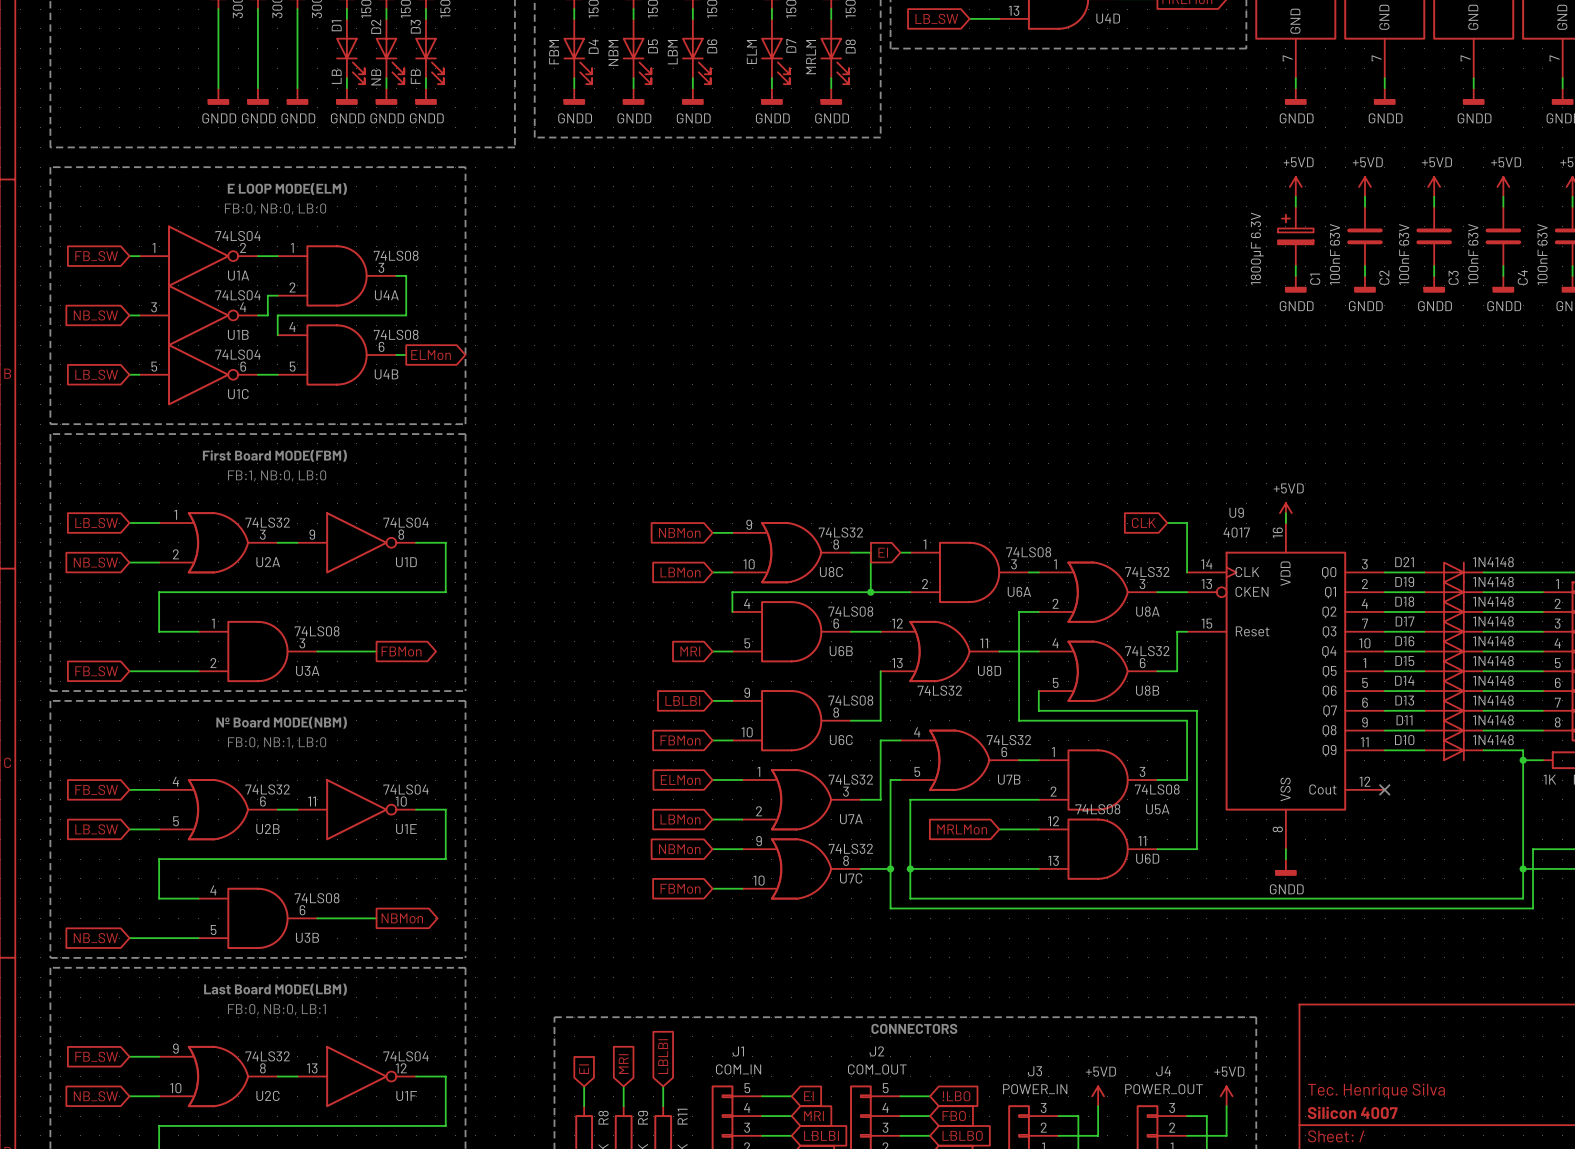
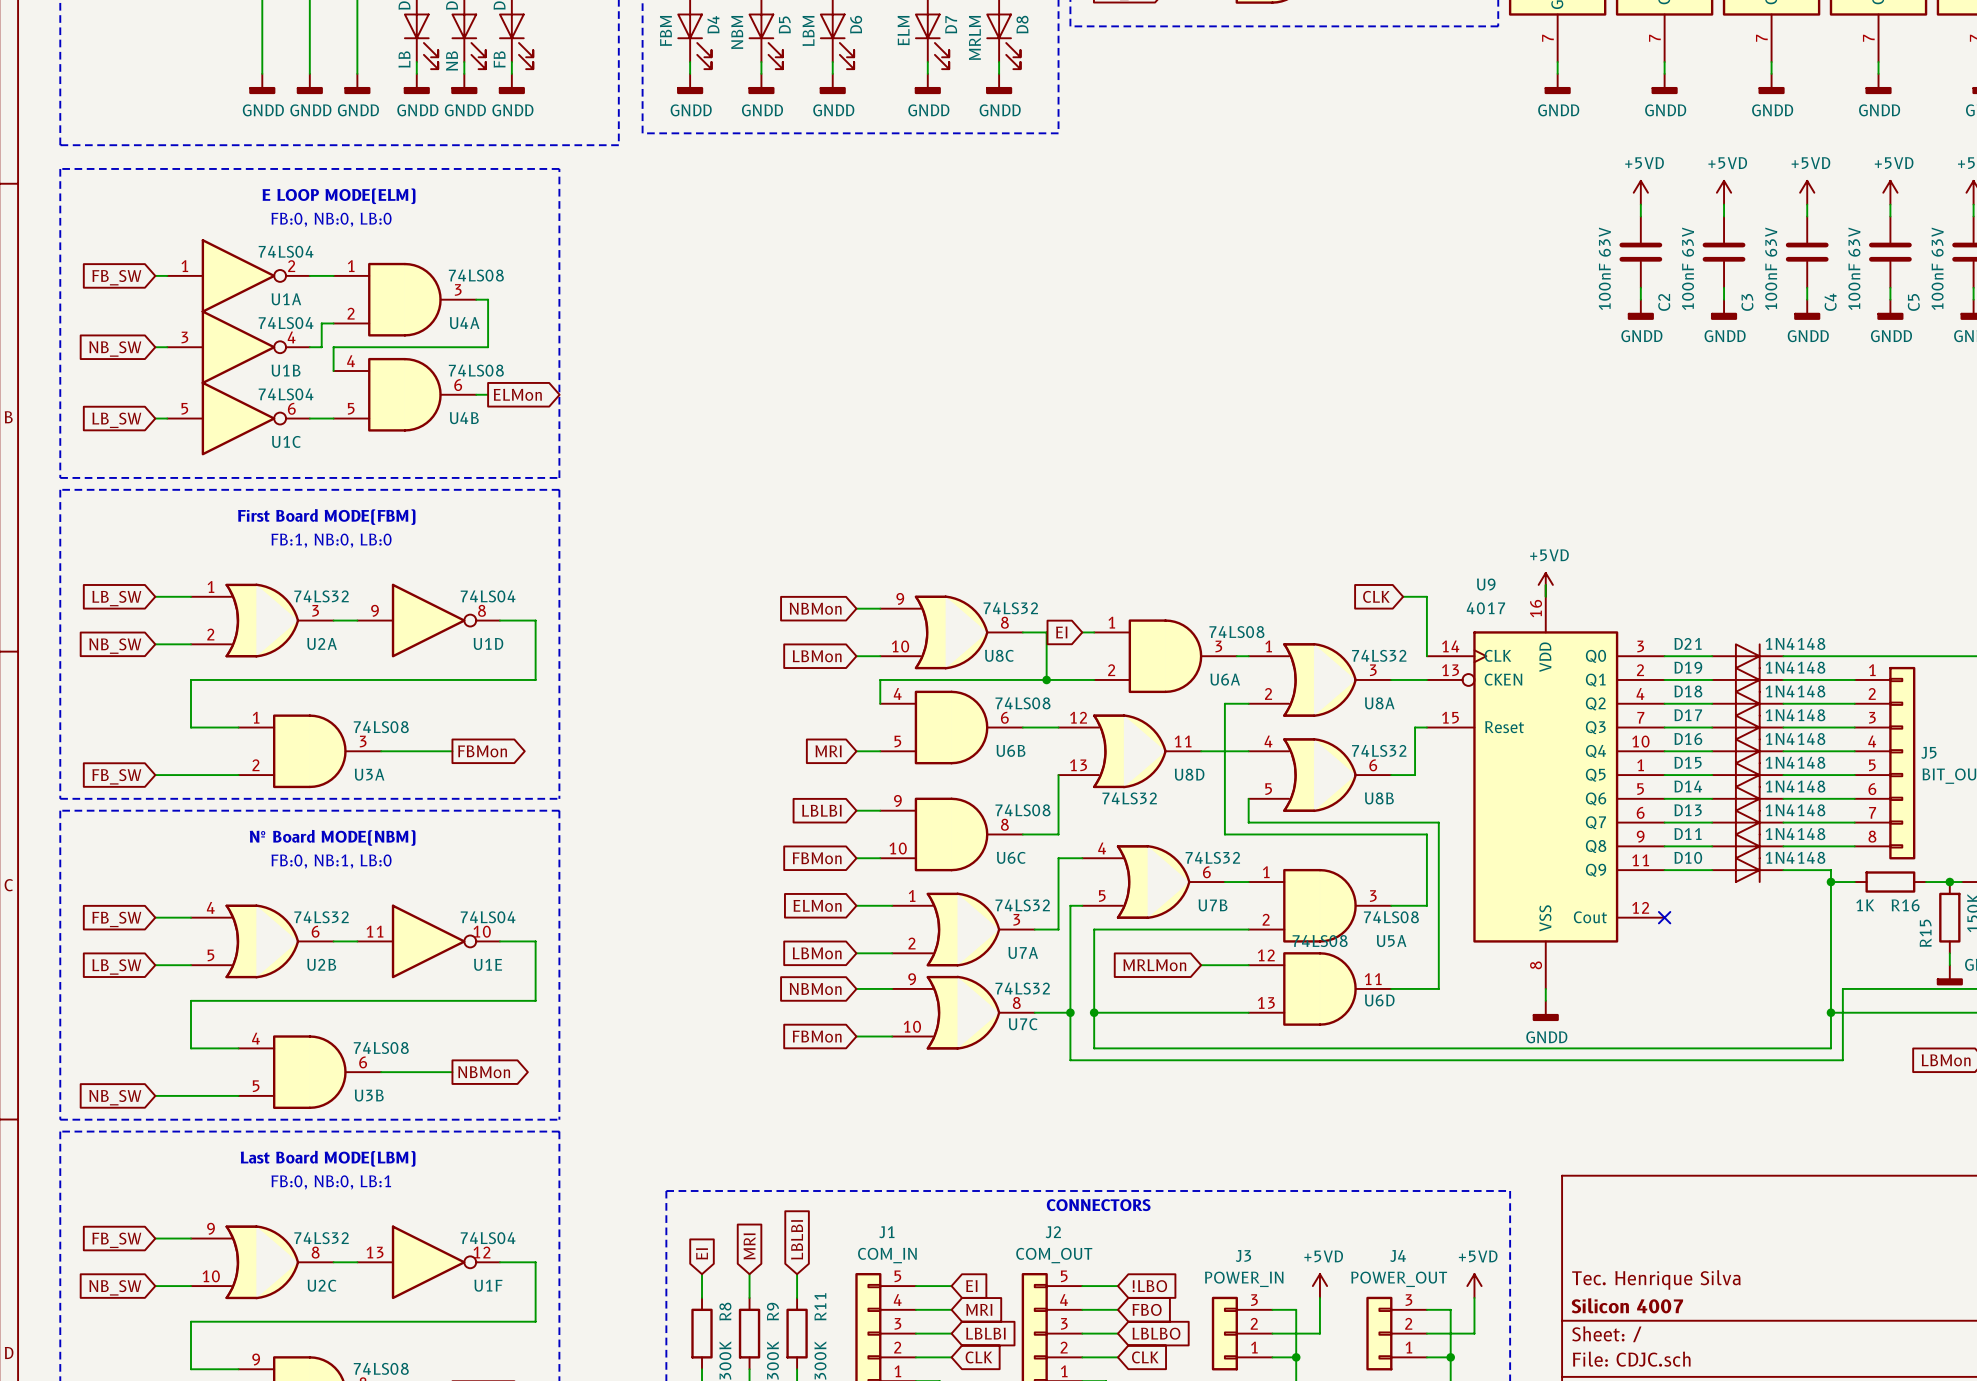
power symbol: +5VD (1295, 186) -> none
wire: (1295, 196) (1295, 206) -> none
C1: 1800µF 6.3V (1295, 236) -> none
wire: (1295, 266) (1295, 275) -> none
power symbol: GNDD (1295, 284) -> none

